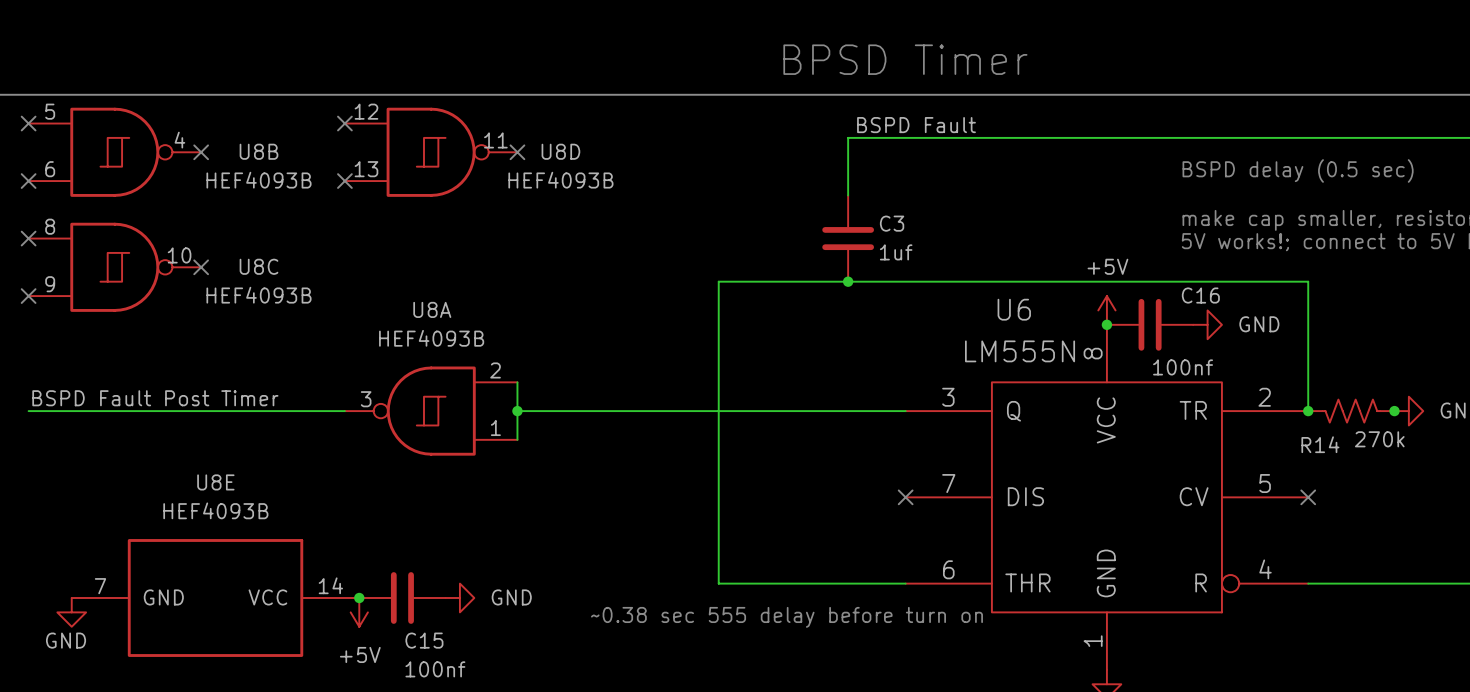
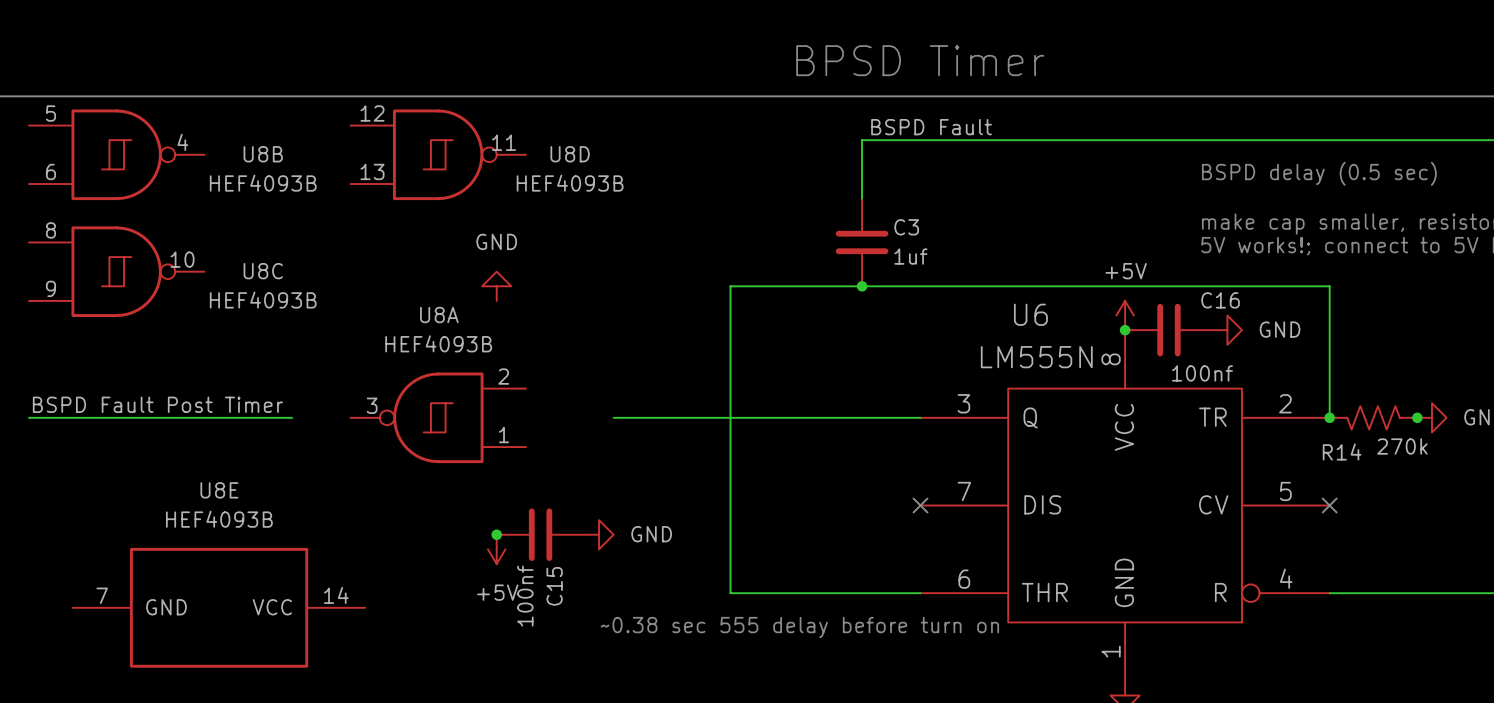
no-connect mark: (28, 123) -> none
no-connect mark: (344, 123) -> none
no-connect mark: (201, 152) -> none
no-connect mark: (517, 152) -> none
no-connect mark: (28, 181) -> none
no-connect mark: (344, 181) -> none
no-connect mark: (28, 238) -> none
no-connect mark: (201, 267) -> none
power symbol: none -> GND (496, 286)
no-connect mark: (28, 296) -> none
wire: (517, 382) (517, 439) -> none
wire: (287, 411) (344, 411) -> none
wire: (517, 411) (603, 411) -> none
junction: (517, 411) -> none
junction: none -> (496, 534)
junction: (359, 597) -> none
C15 position: (402, 597) -> (540, 534)
power symbol position: GND (459, 597) -> GND (599, 534)
power symbol: GND (71, 612) -> none
power symbol position: +5V (359, 612) -> +5V (496, 549)
C15 name rotation: 0° (424, 640) -> 90° counterclockwise (554, 586)
C15 value rotation: 0° (435, 669) -> 90° counterclockwise (525, 596)

